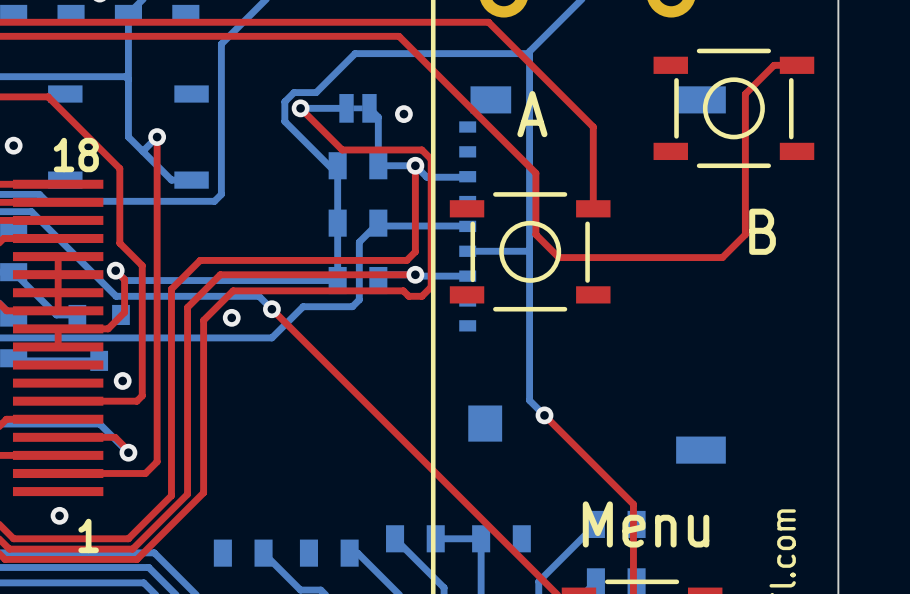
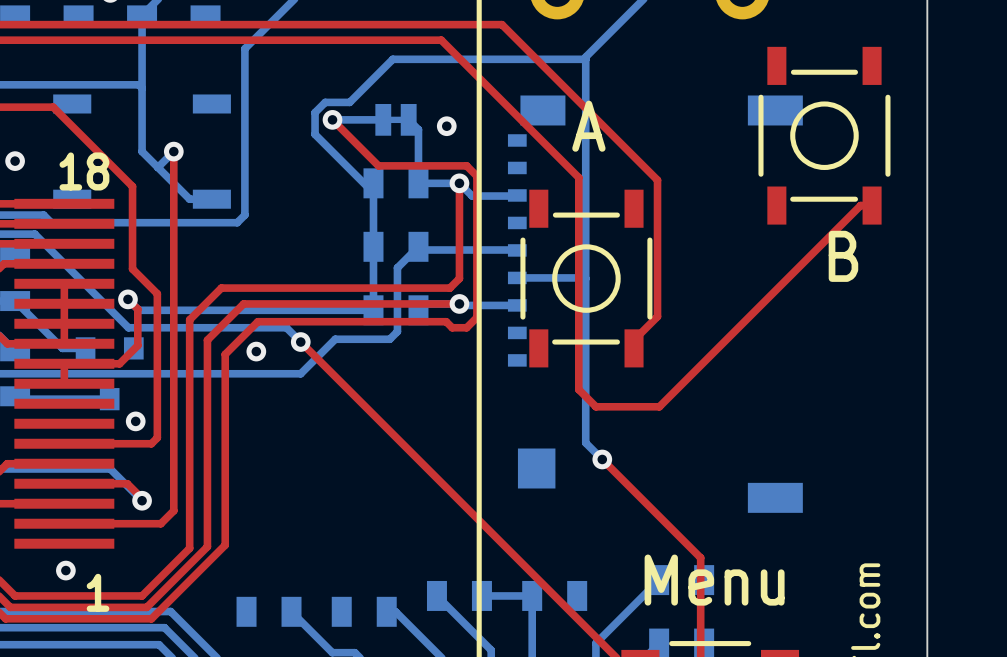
top track: (453, 22) (488, 22) (593, 126) (593, 208) -> (501, 24) (657, 180) (657, 316) (634, 340) (634, 348)
top track: (797, 65) (774, 65) (745, 94) (745, 234) (722, 257) (558, 257) (535, 234) (535, 173) (523, 160) -> (872, 205) (860, 205) (659, 406) (595, 406) (578, 389) (578, 177)
part rotation: 0° (733, 108) -> 90° clockwise (824, 135)
part rotation: 0° (530, 251) -> 90° clockwise (586, 278)

